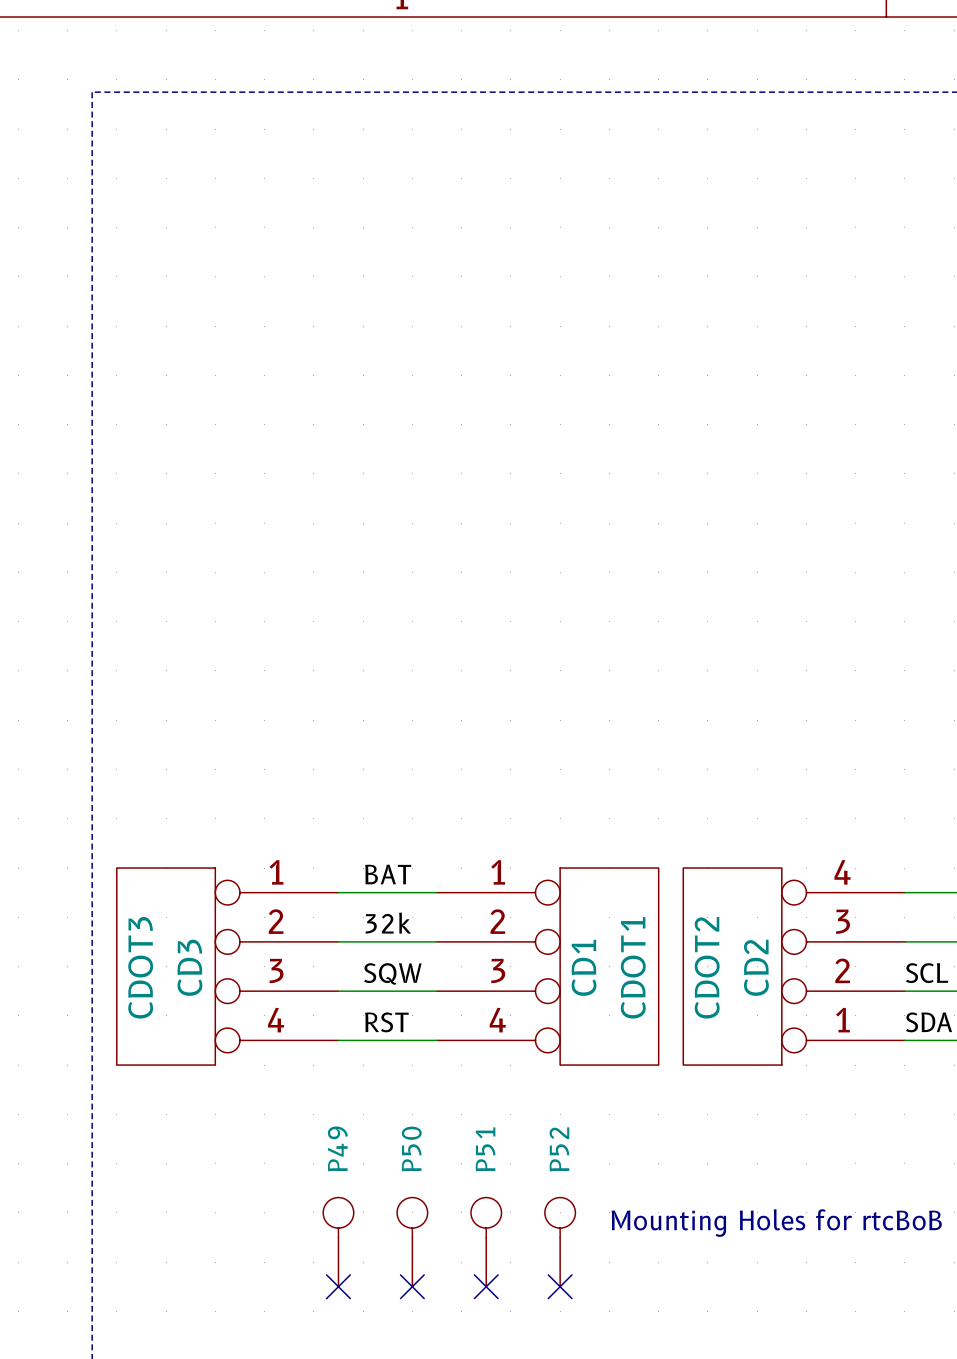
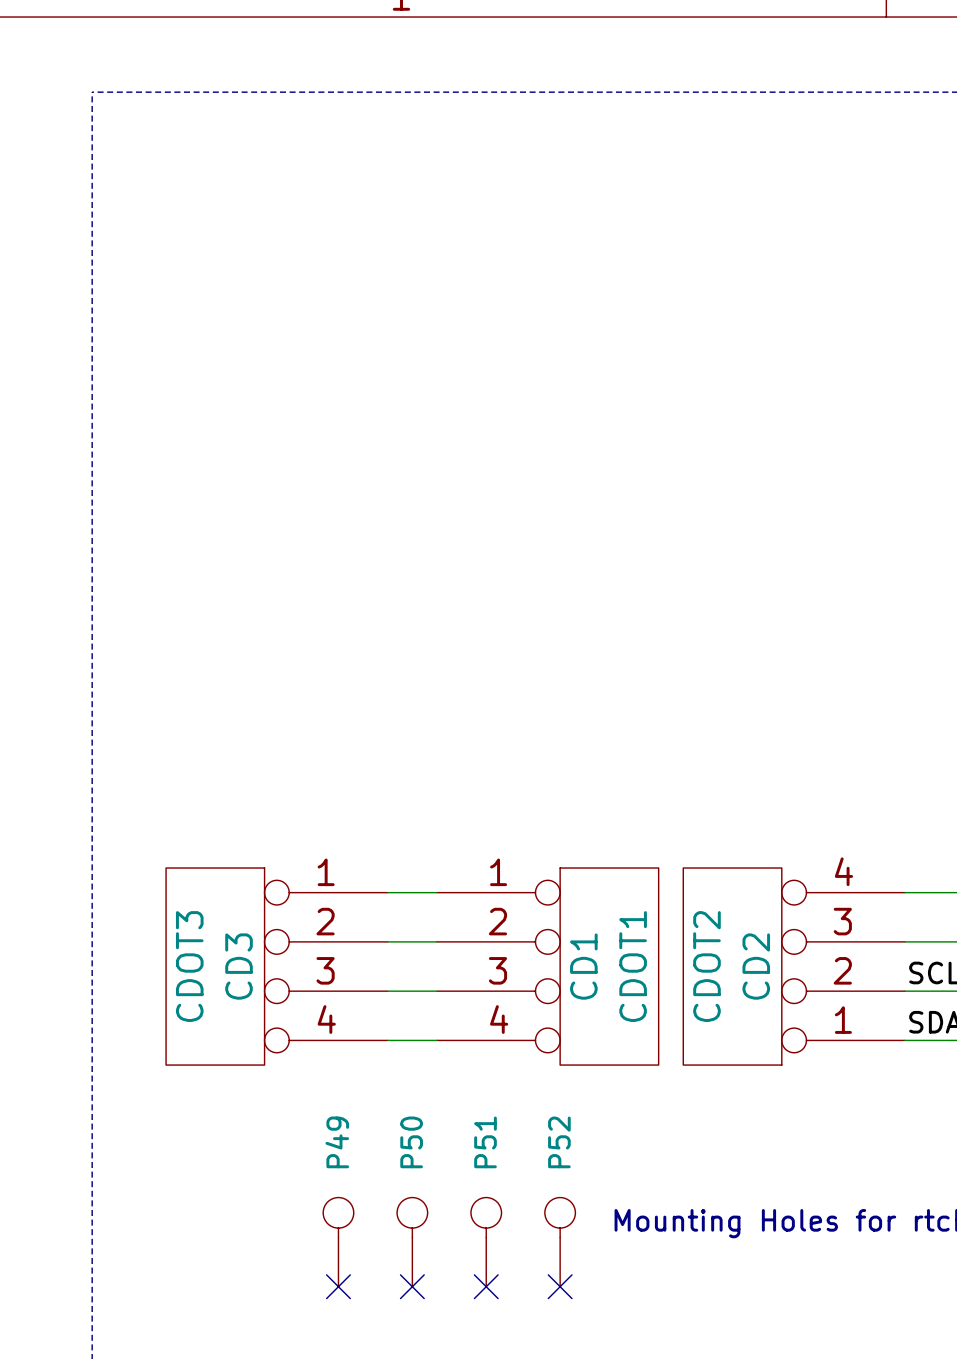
label: BAT (388, 874) -> none
label: 32k (388, 923) -> none
CD3 position: (227, 966) -> (276, 966)
label: SQW (392, 973) -> none
label: RST (386, 1022) -> none

